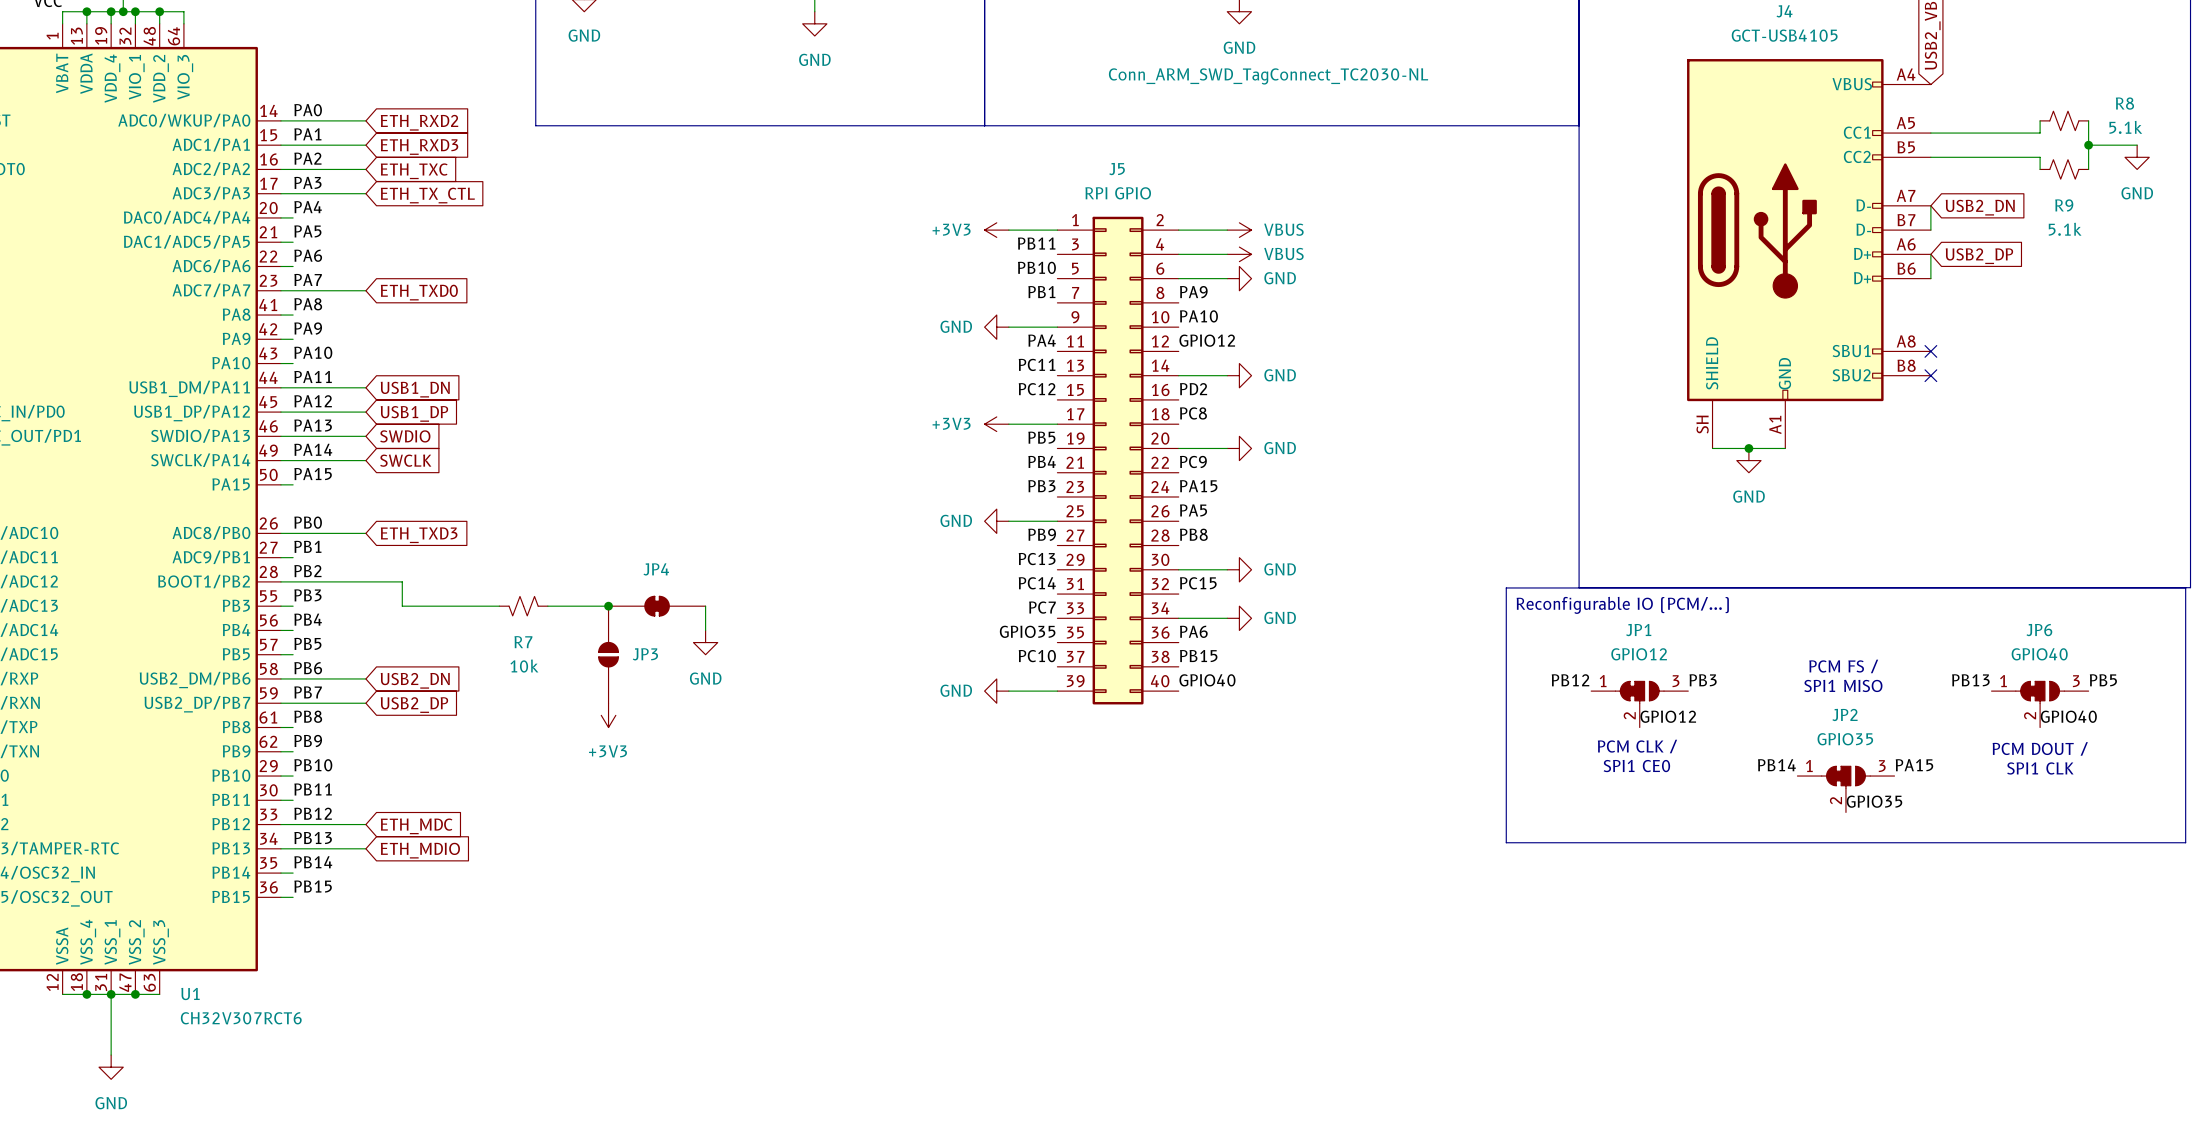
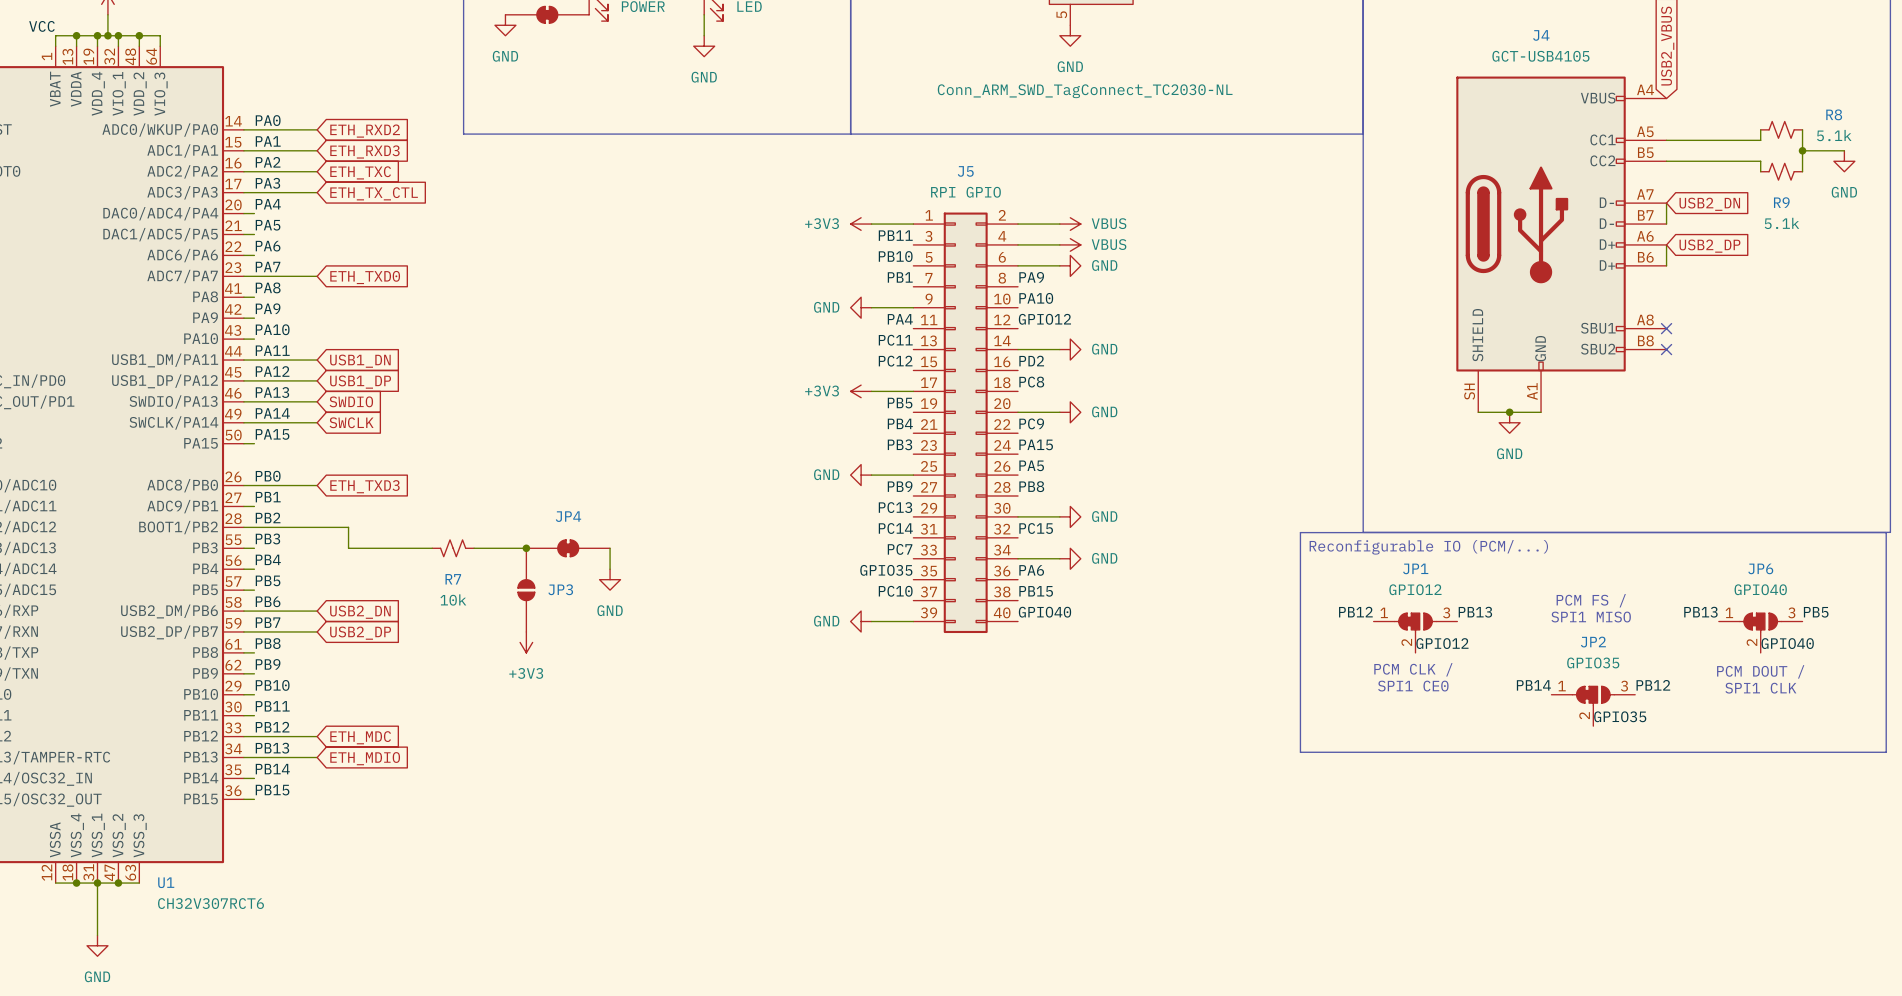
label: PB3 (1703, 680) -> PB13 (1475, 612)
label: PA15 (1914, 765) -> PB12 (1653, 685)

